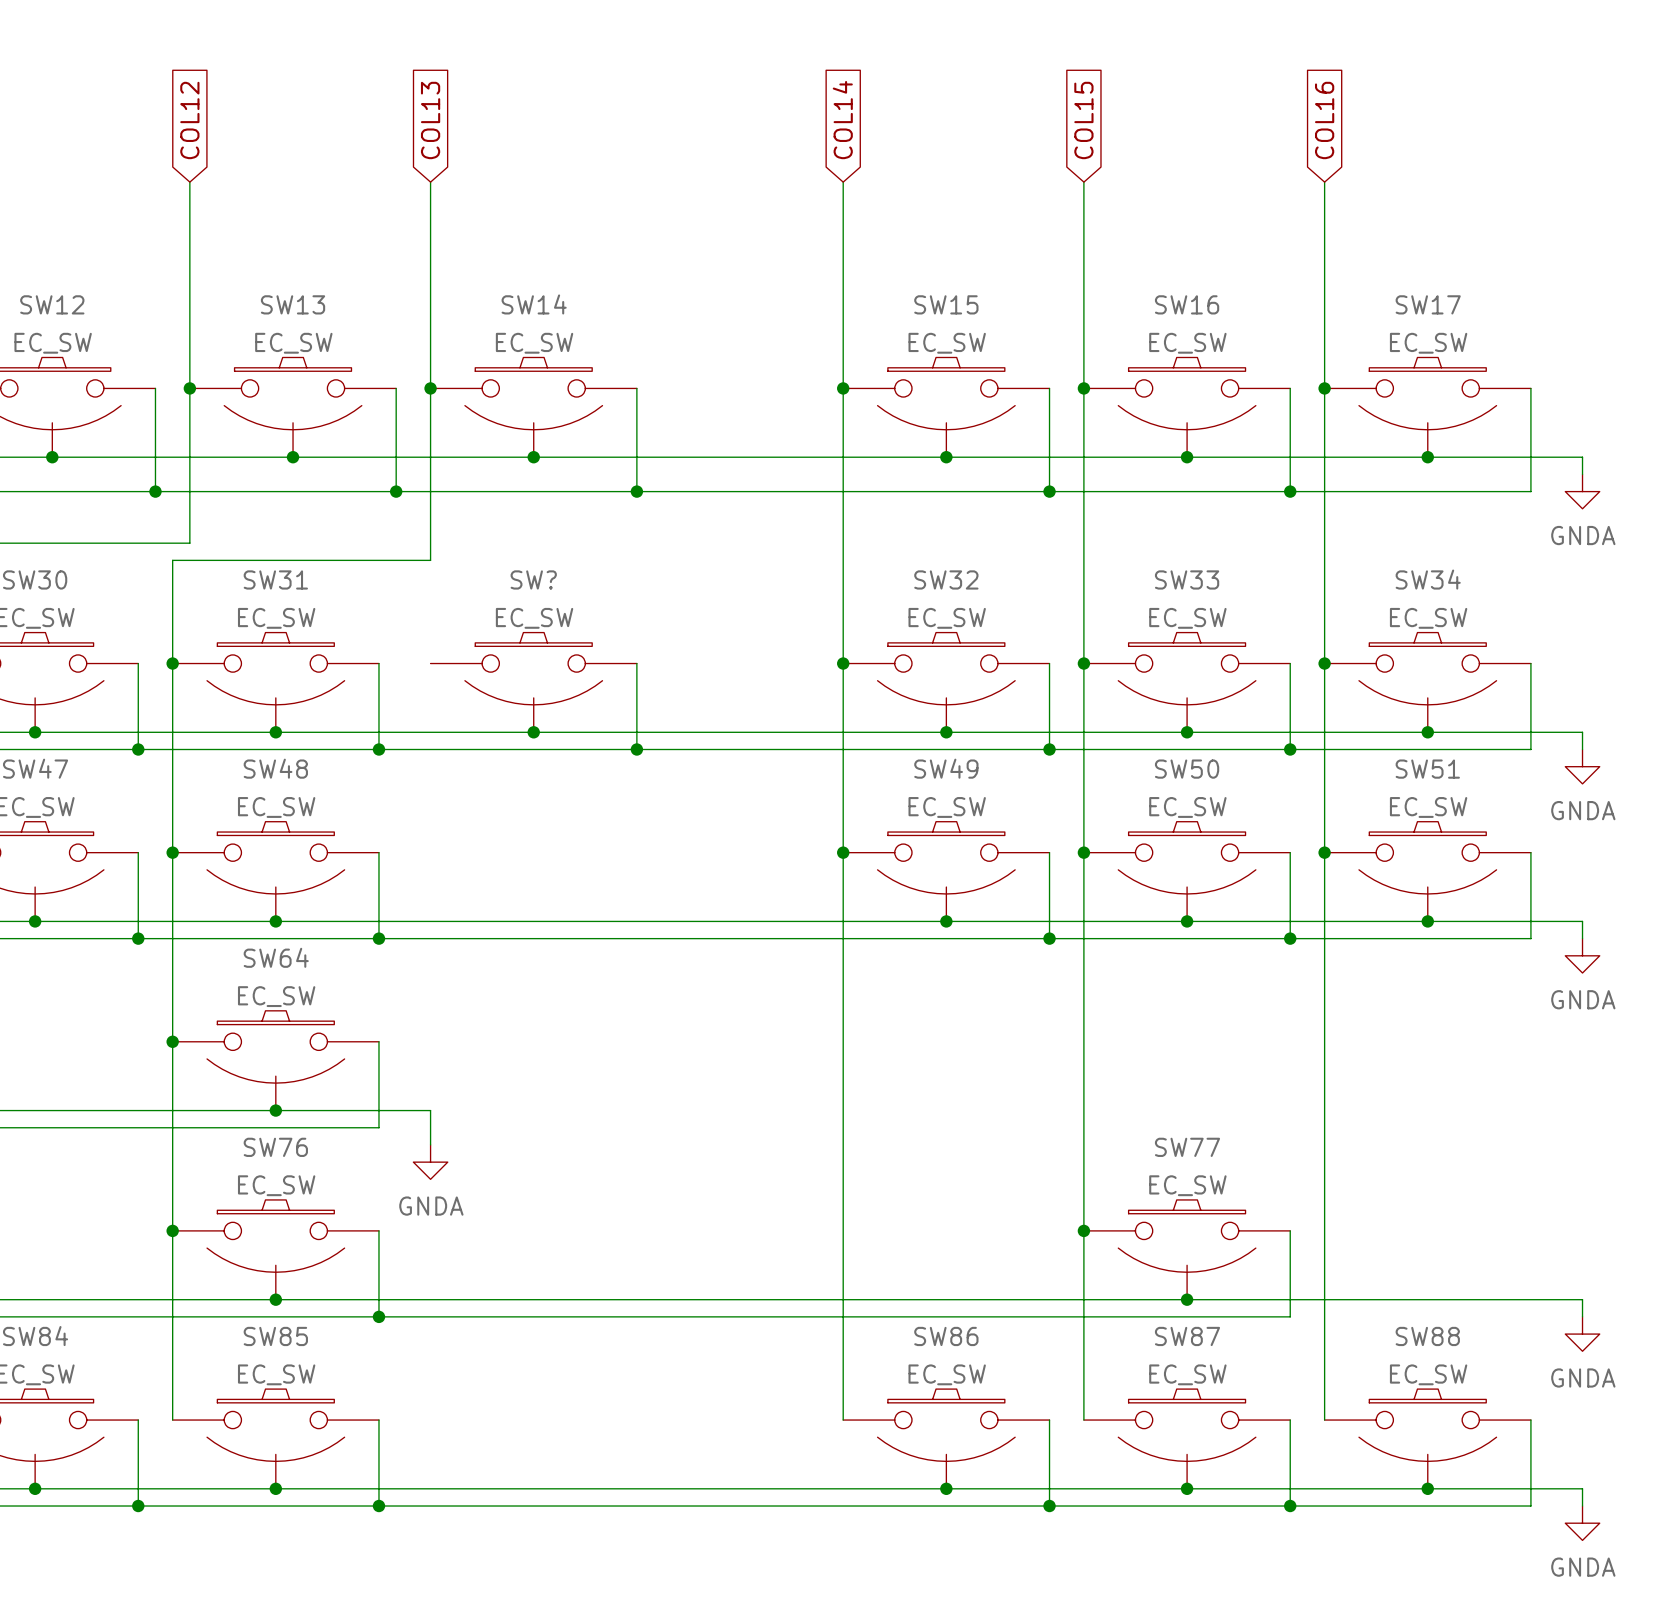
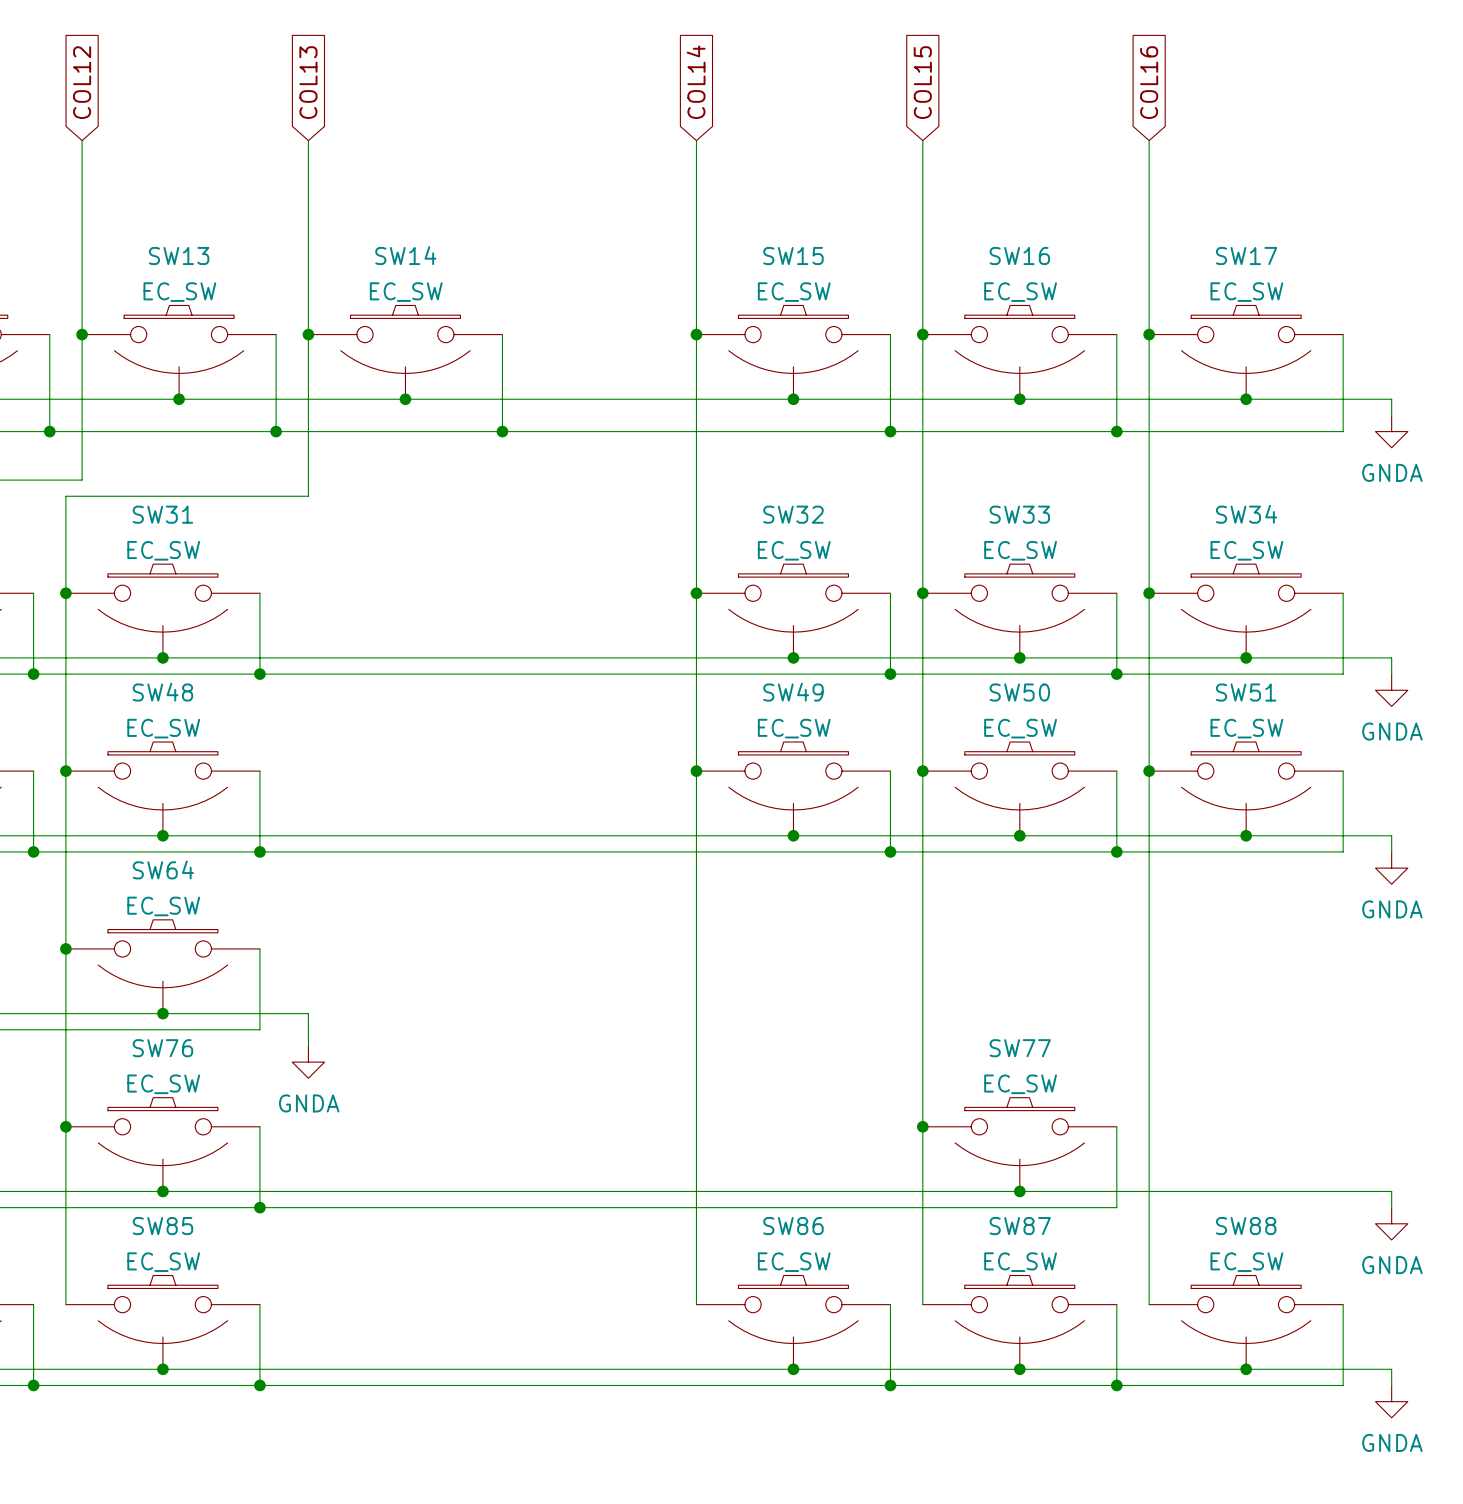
wire: (636, 663) (636, 749) -> none
SW?: EC_SW (533, 682) -> none
junction: (533, 732) -> none
junction: (636, 749) -> none

